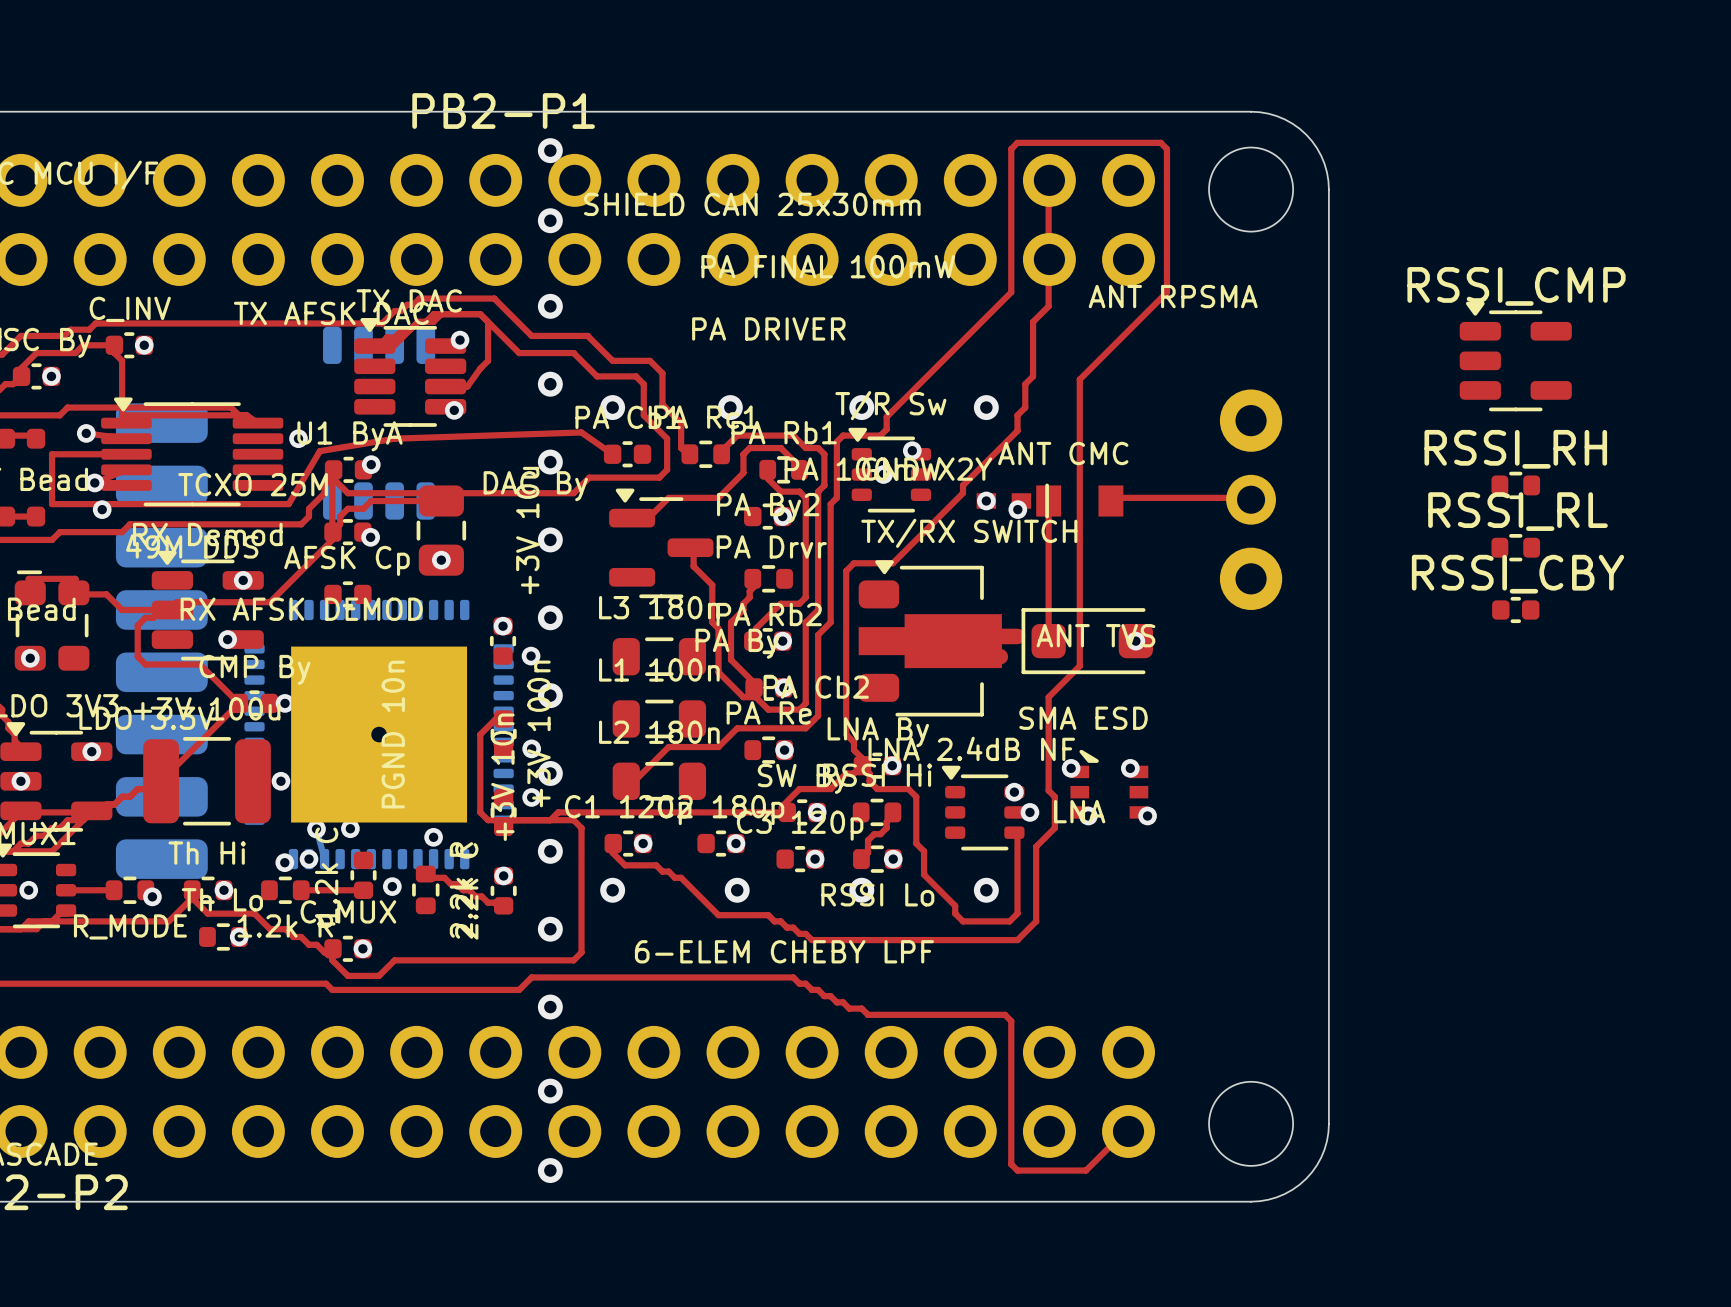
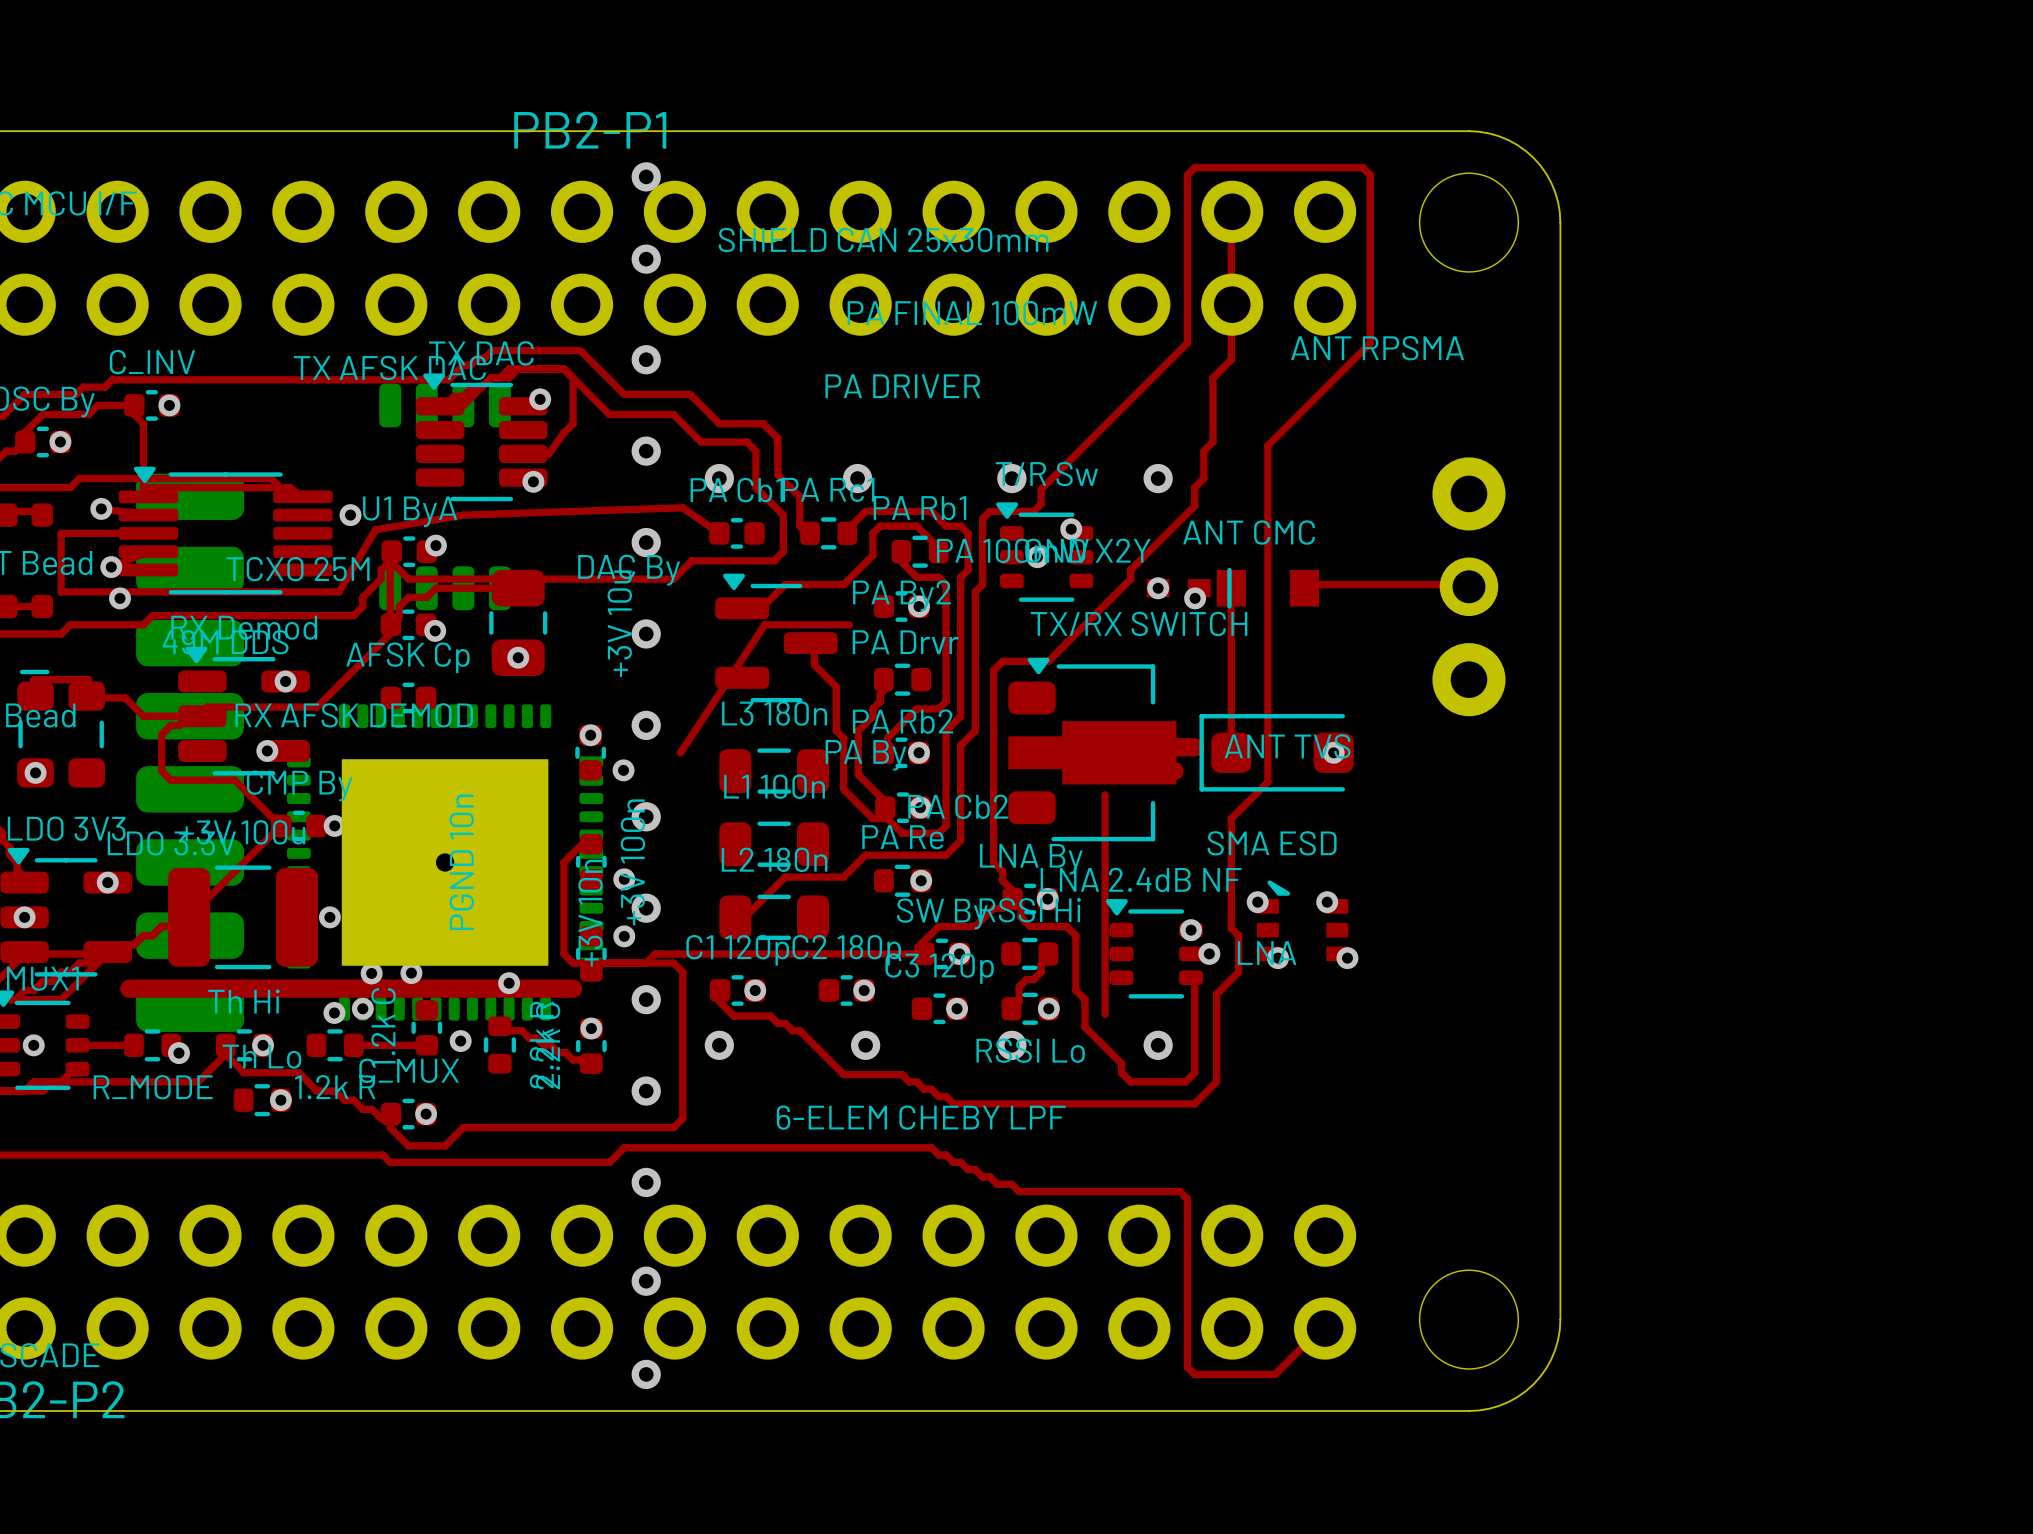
RSSI_CMP: (1515, 356) -> none
RSSI_RH: (1515, 485) -> none
top track: none -> (849, 624) (764, 624) (680, 752)
RSSI_RL: (1515, 547) -> none
RSSI_CBY: (1515, 609) -> none
top track: none -> (1105, 794) (1105, 1014)
top track: none -> (129, 988) (573, 988)

